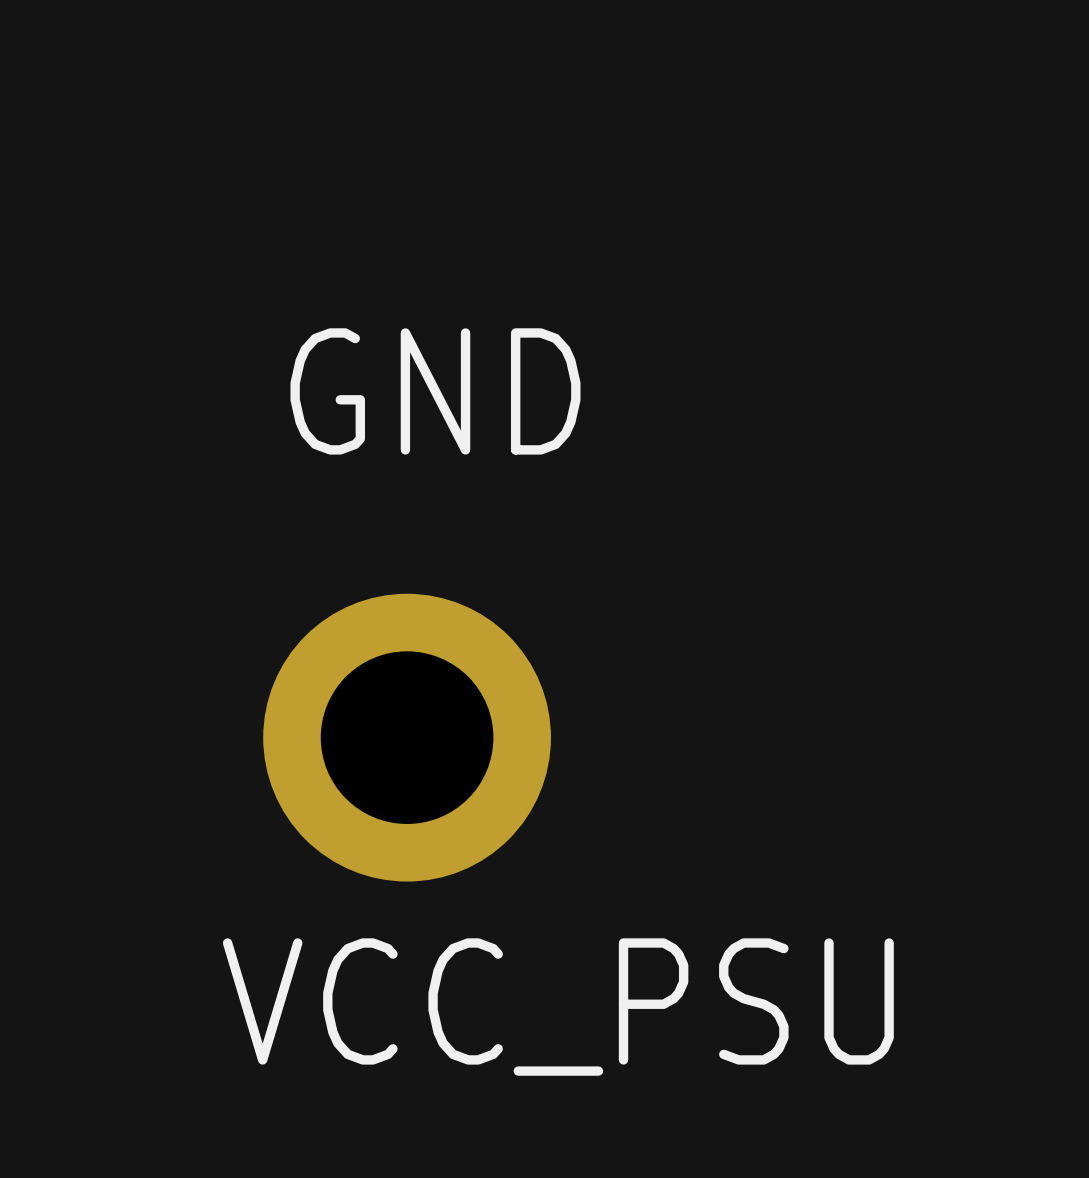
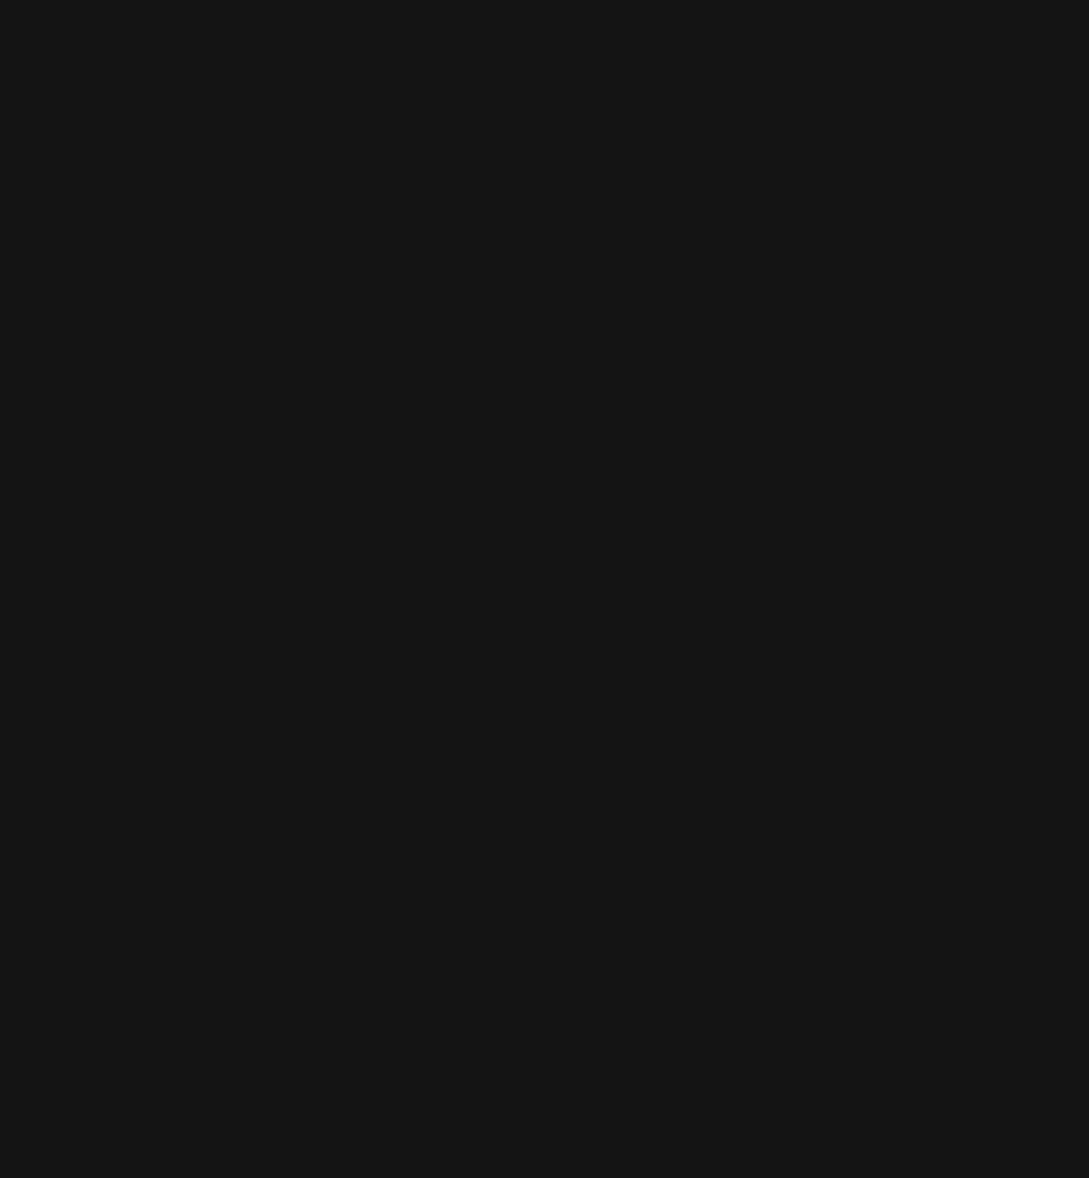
text: GND (435, 391) -> none
via: (407, 737) -> none
text: VCC_PSU (558, 1007) -> none

